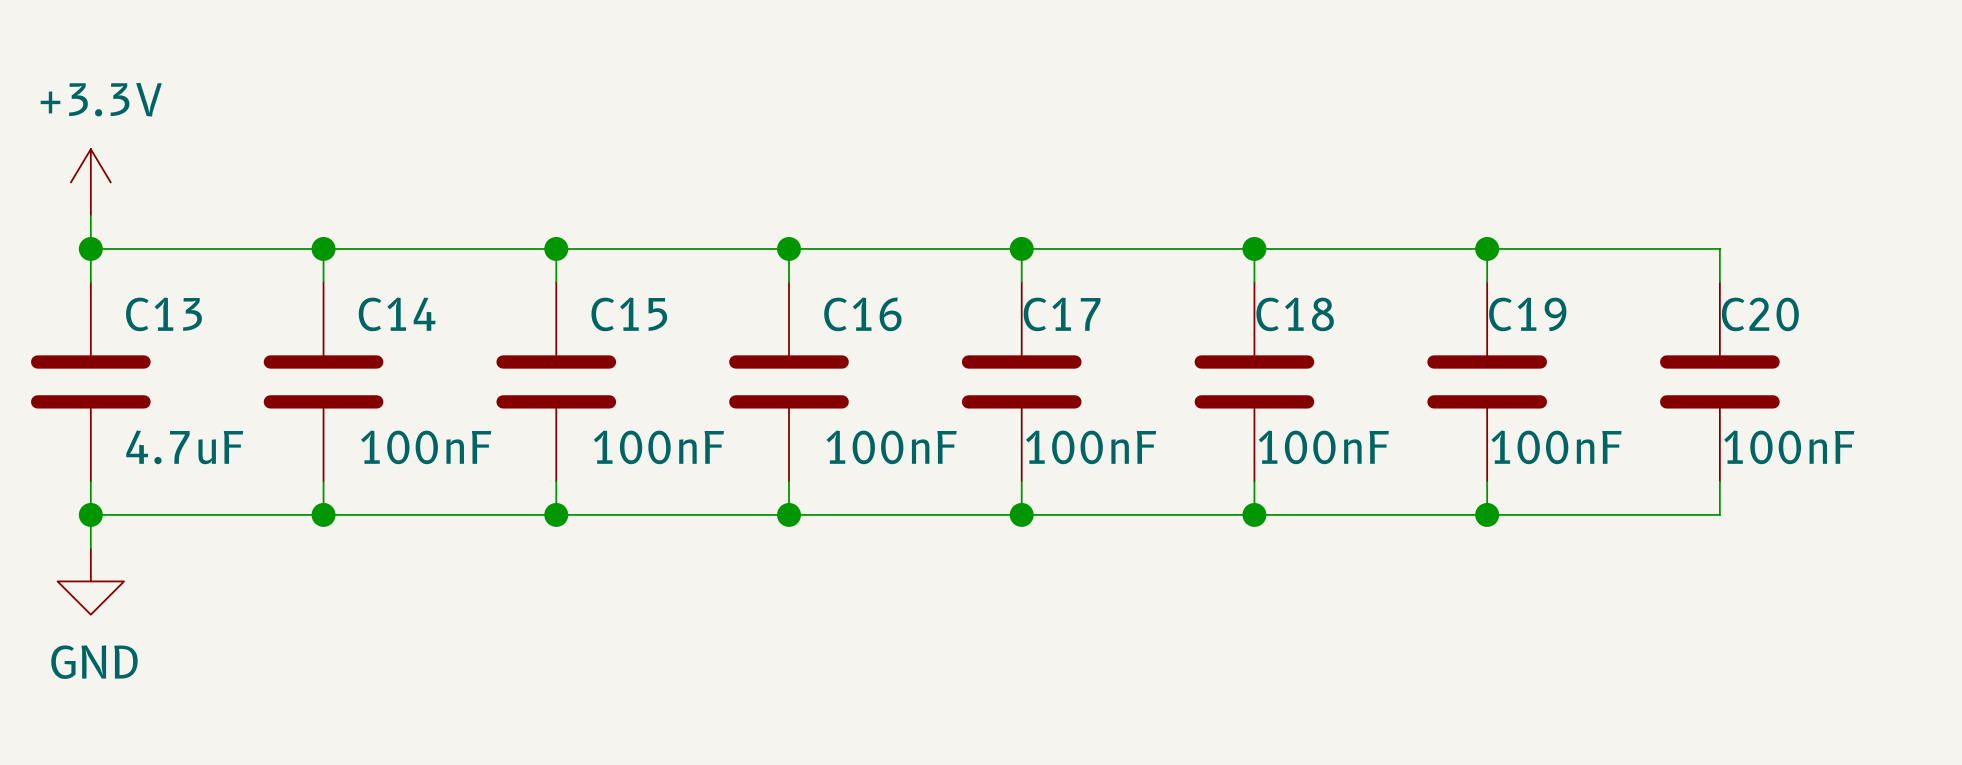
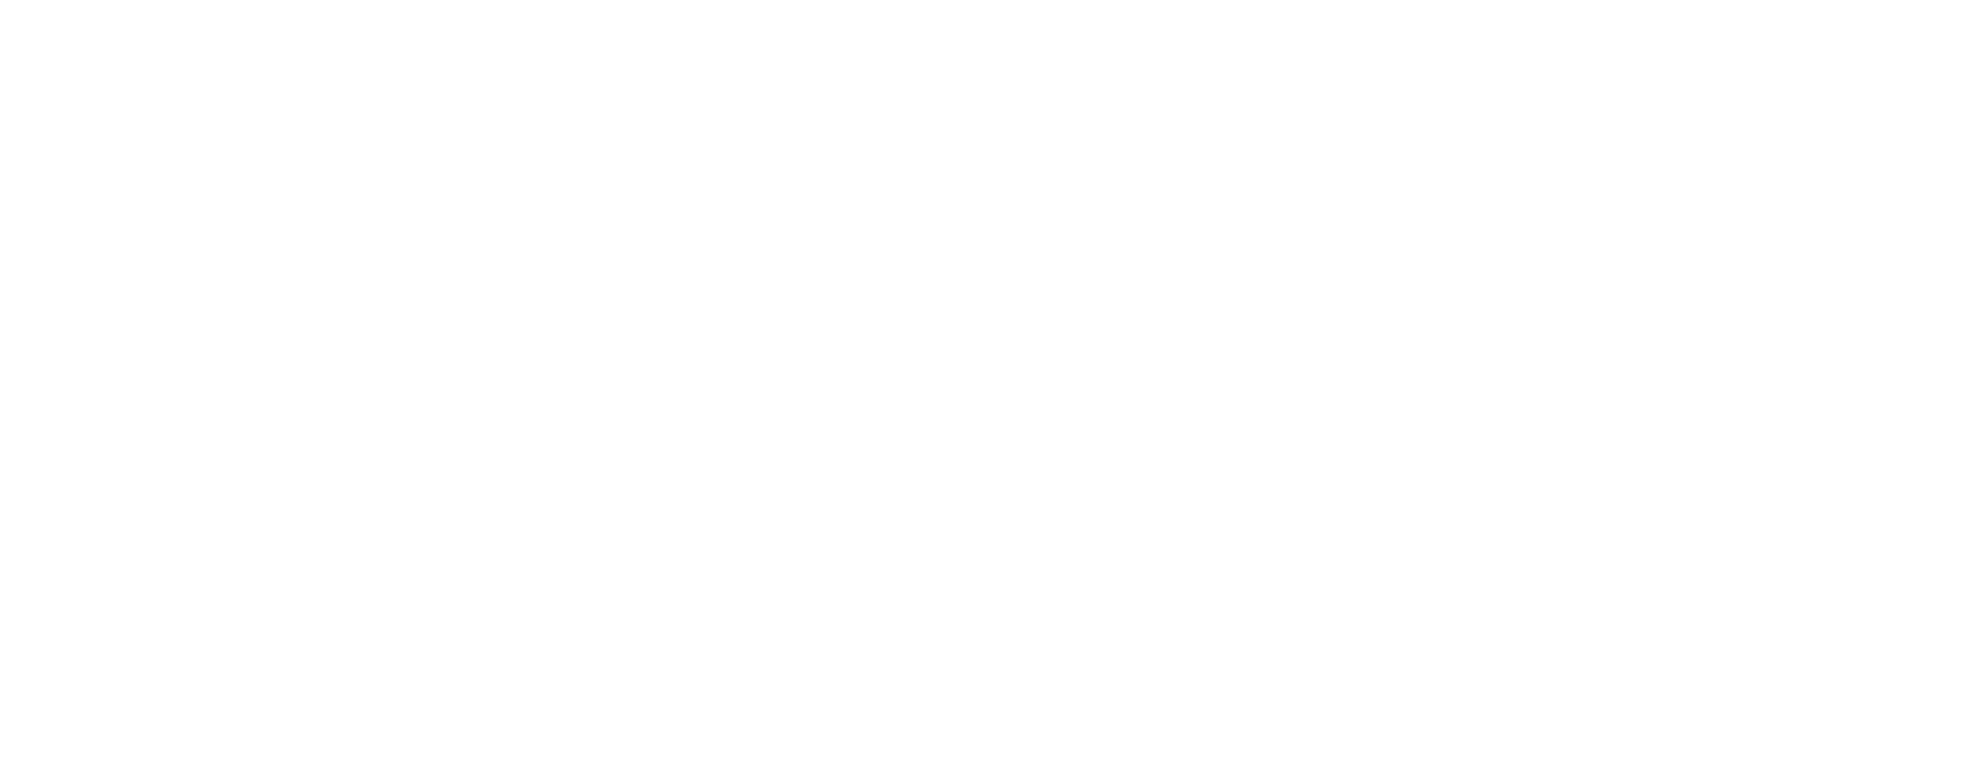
power symbol: +3.3V (90, 182) -> none
wire: (90, 215) (90, 282) -> none
wire: (90, 248) (1719, 248) (1719, 282) -> none
junction: (90, 248) -> none
wire: (323, 248) (323, 282) -> none
junction: (323, 248) -> none
wire: (556, 248) (556, 282) -> none
junction: (556, 248) -> none
wire: (788, 248) (788, 282) -> none
junction: (788, 248) -> none
wire: (1021, 248) (1021, 282) -> none
junction: (1021, 248) -> none
wire: (1254, 248) (1254, 282) -> none
junction: (1254, 248) -> none
wire: (1487, 248) (1487, 282) -> none
junction: (1487, 248) -> none
C13: 4.7uF (90, 381) -> none
C14: 100nF (323, 381) -> none
C15: 100nF (556, 381) -> none
C16: 100nF (788, 381) -> none
C17: 100nF (1021, 381) -> none
C18: 100nF (1254, 381) -> none
C19: 100nF (1487, 381) -> none
C20: 100nF (1719, 381) -> none
wire: (90, 481) (90, 548) -> none
wire: (323, 481) (323, 514) -> none
wire: (556, 481) (556, 514) -> none
wire: (788, 481) (788, 514) -> none
wire: (1021, 481) (1021, 514) -> none
wire: (1254, 481) (1254, 514) -> none
wire: (1487, 481) (1487, 514) -> none
wire: (1719, 481) (1719, 514) (90, 514) -> none
junction: (90, 514) -> none
junction: (323, 514) -> none
junction: (556, 514) -> none
junction: (788, 514) -> none
junction: (1021, 514) -> none
junction: (1254, 514) -> none
junction: (1487, 514) -> none
power symbol: GND (90, 581) -> none

